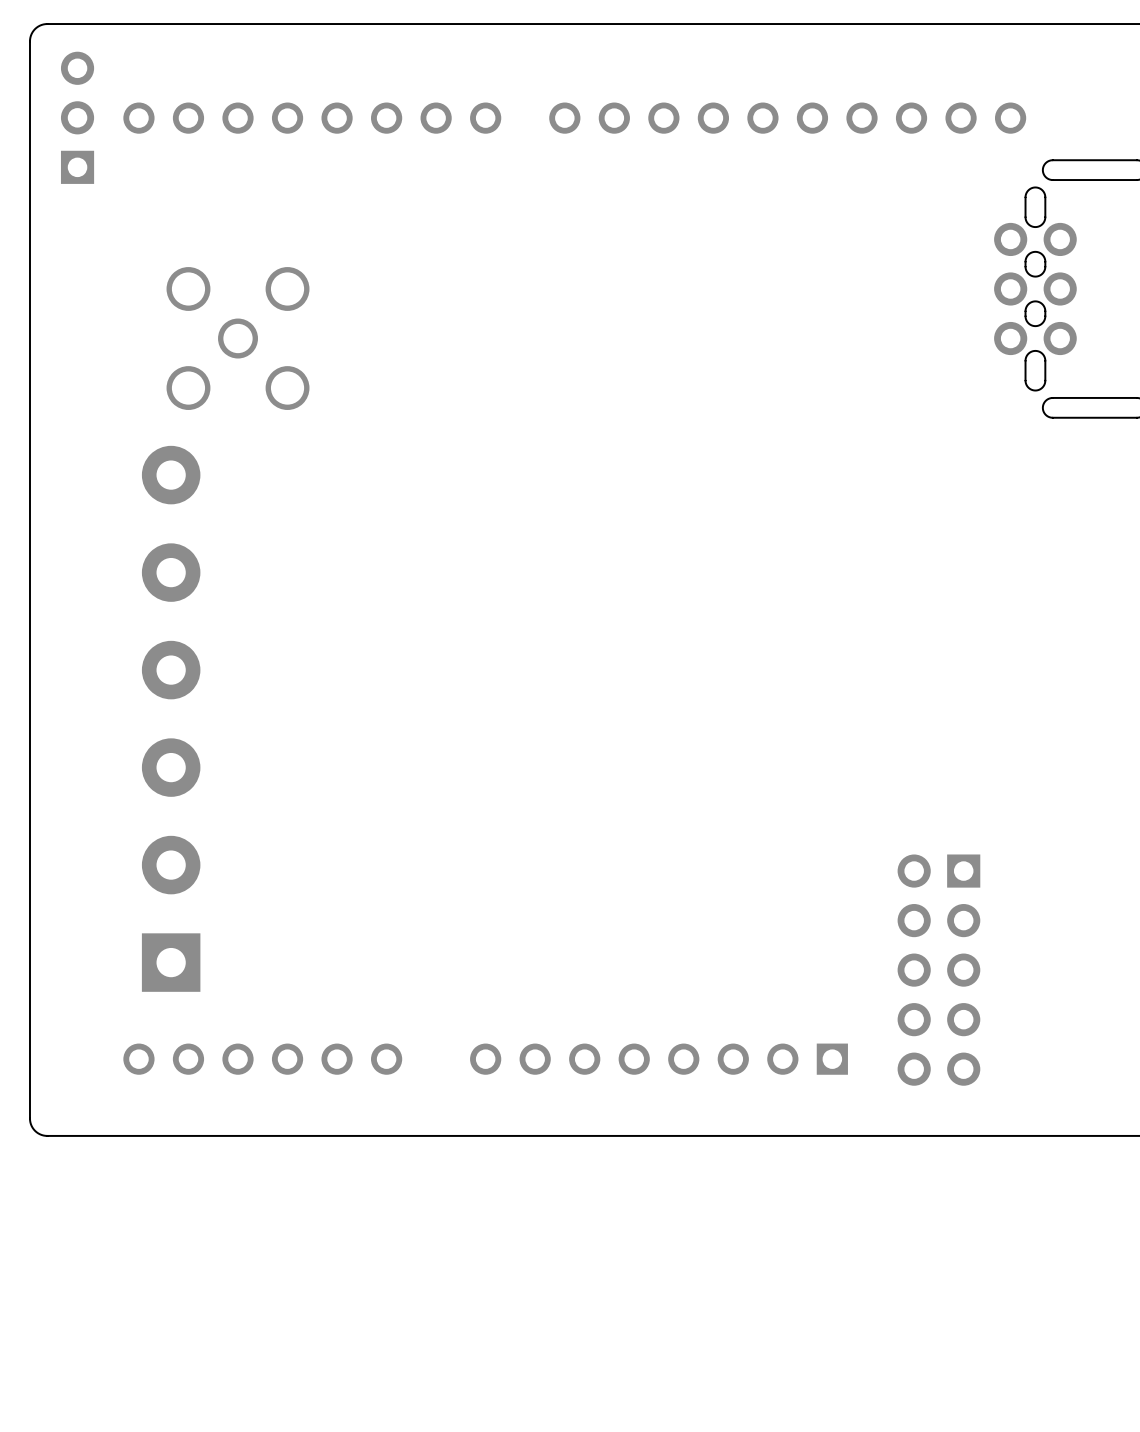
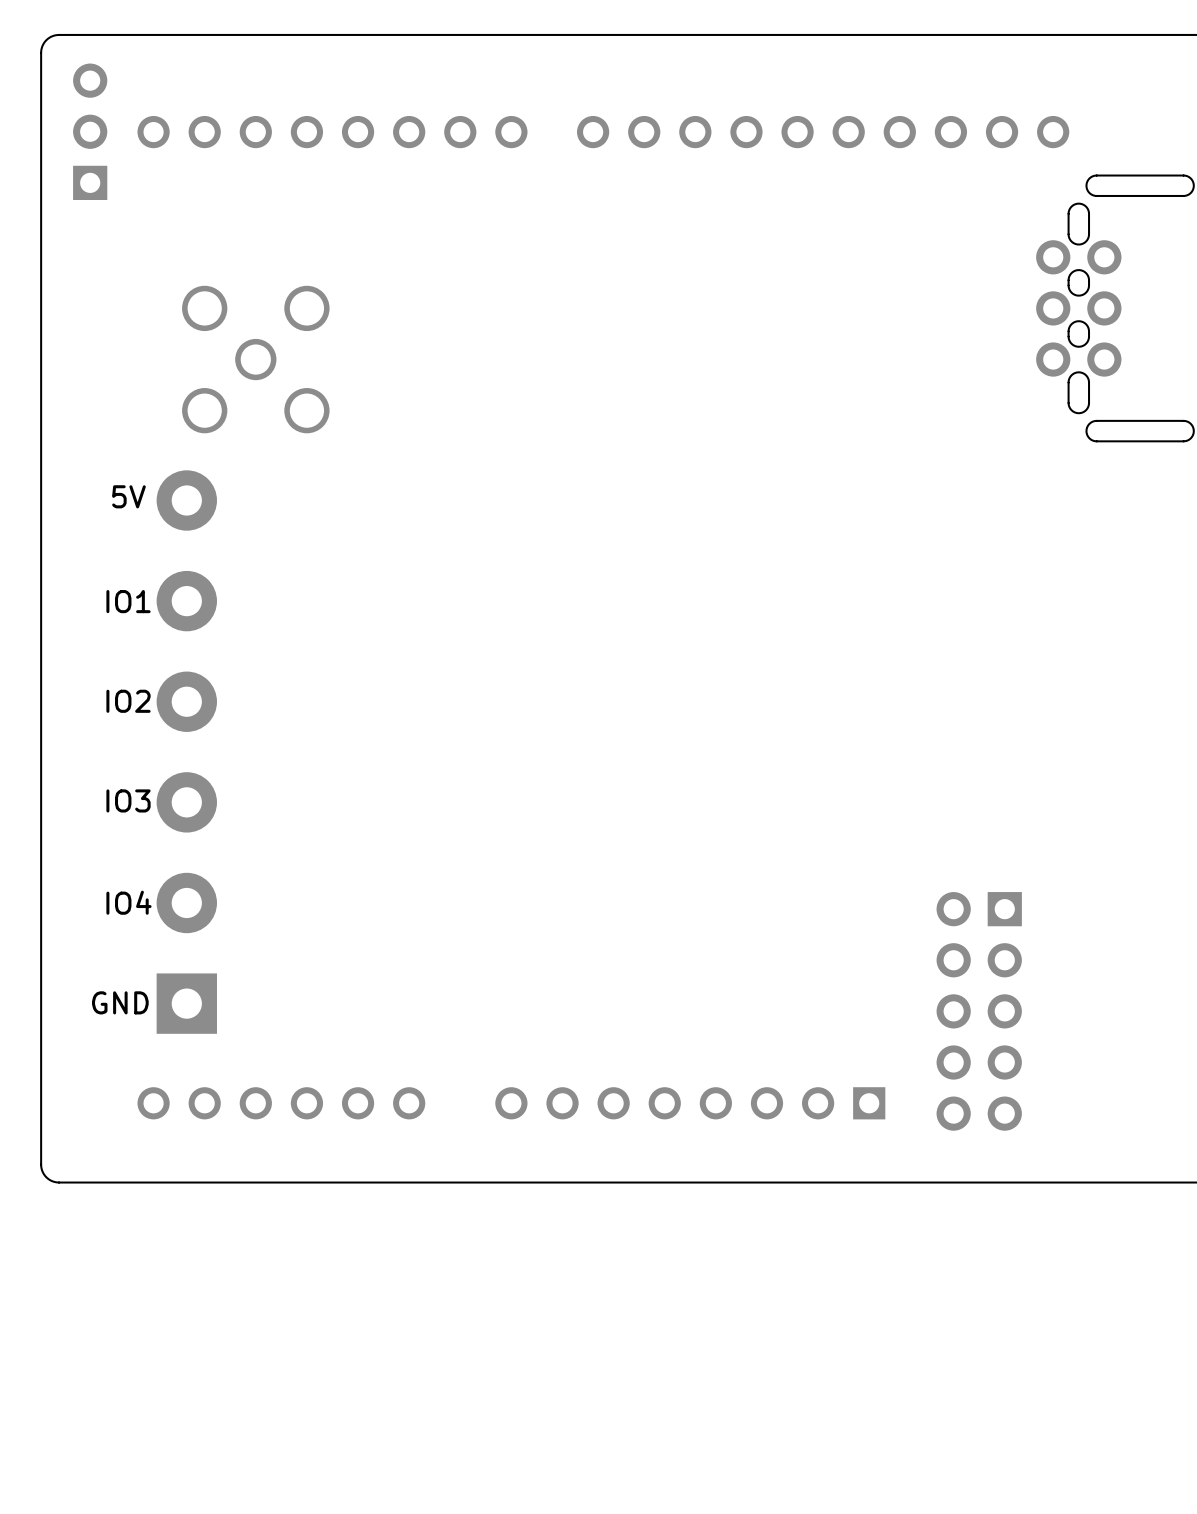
text: none -> 5V (128, 496)
text: none -> IO1 (128, 601)
text: none -> IO2 (128, 701)
text: none -> IO3 (128, 800)
text: none -> IO4 (128, 902)
text: none -> GND (120, 1002)

